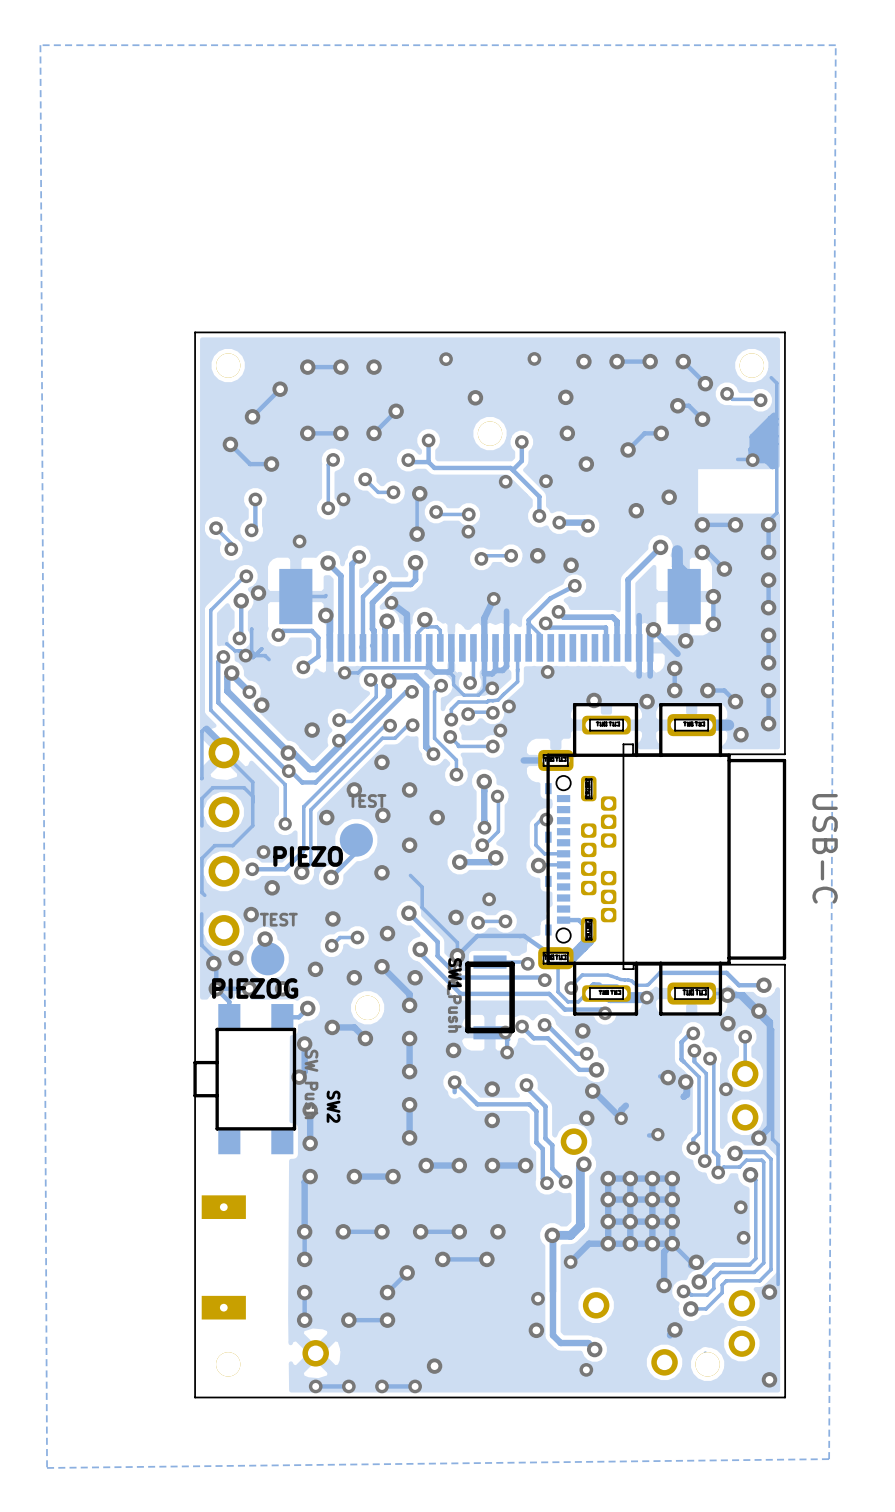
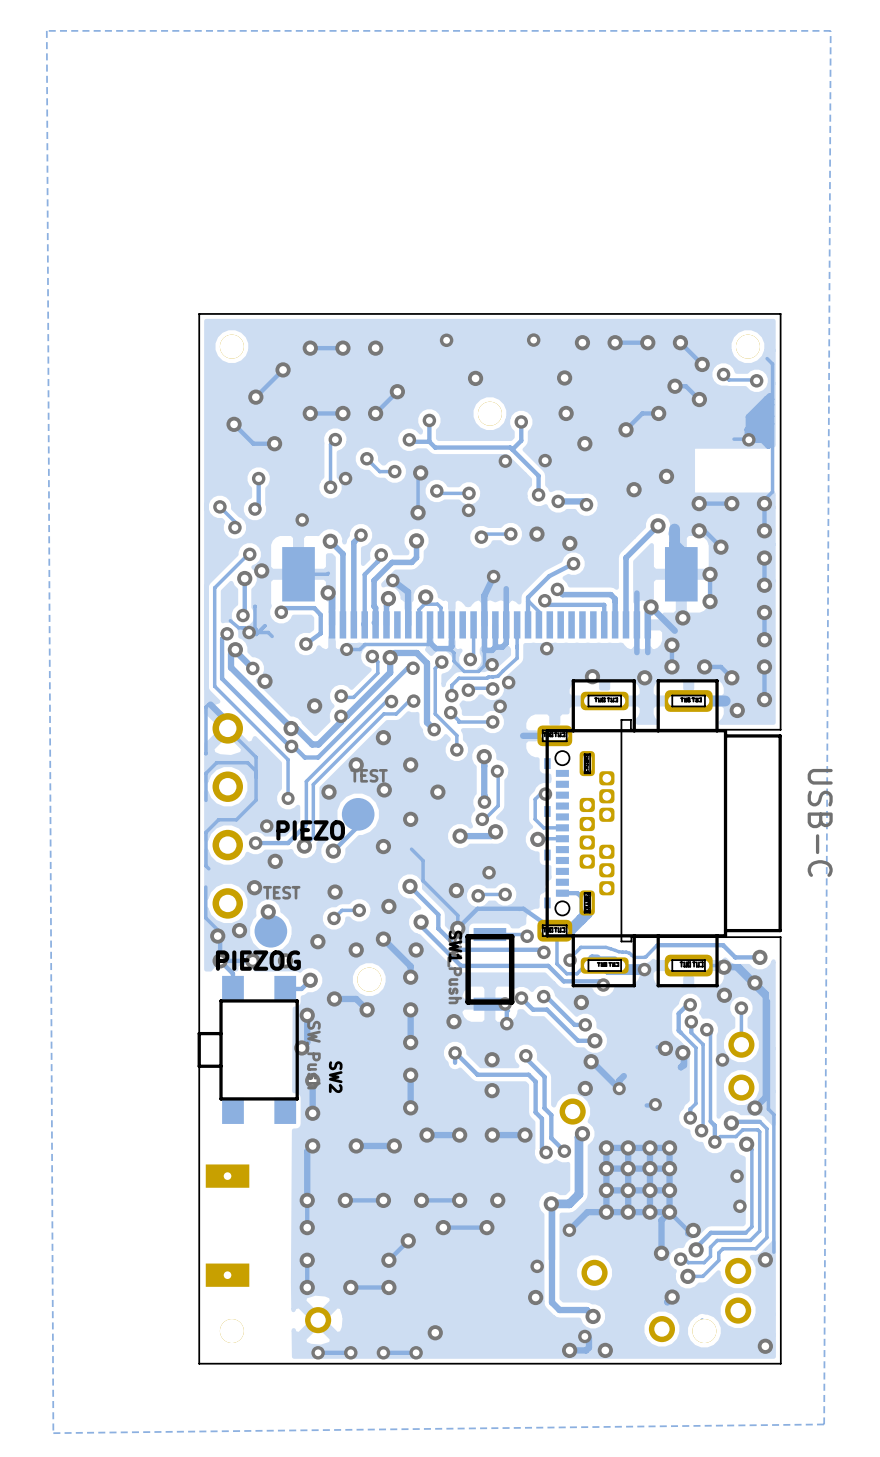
track: none -> (588, 1338) (588, 1347) (586, 1350) (569, 1350)
via: none -> (569, 1350)
via: none -> (605, 1350)

